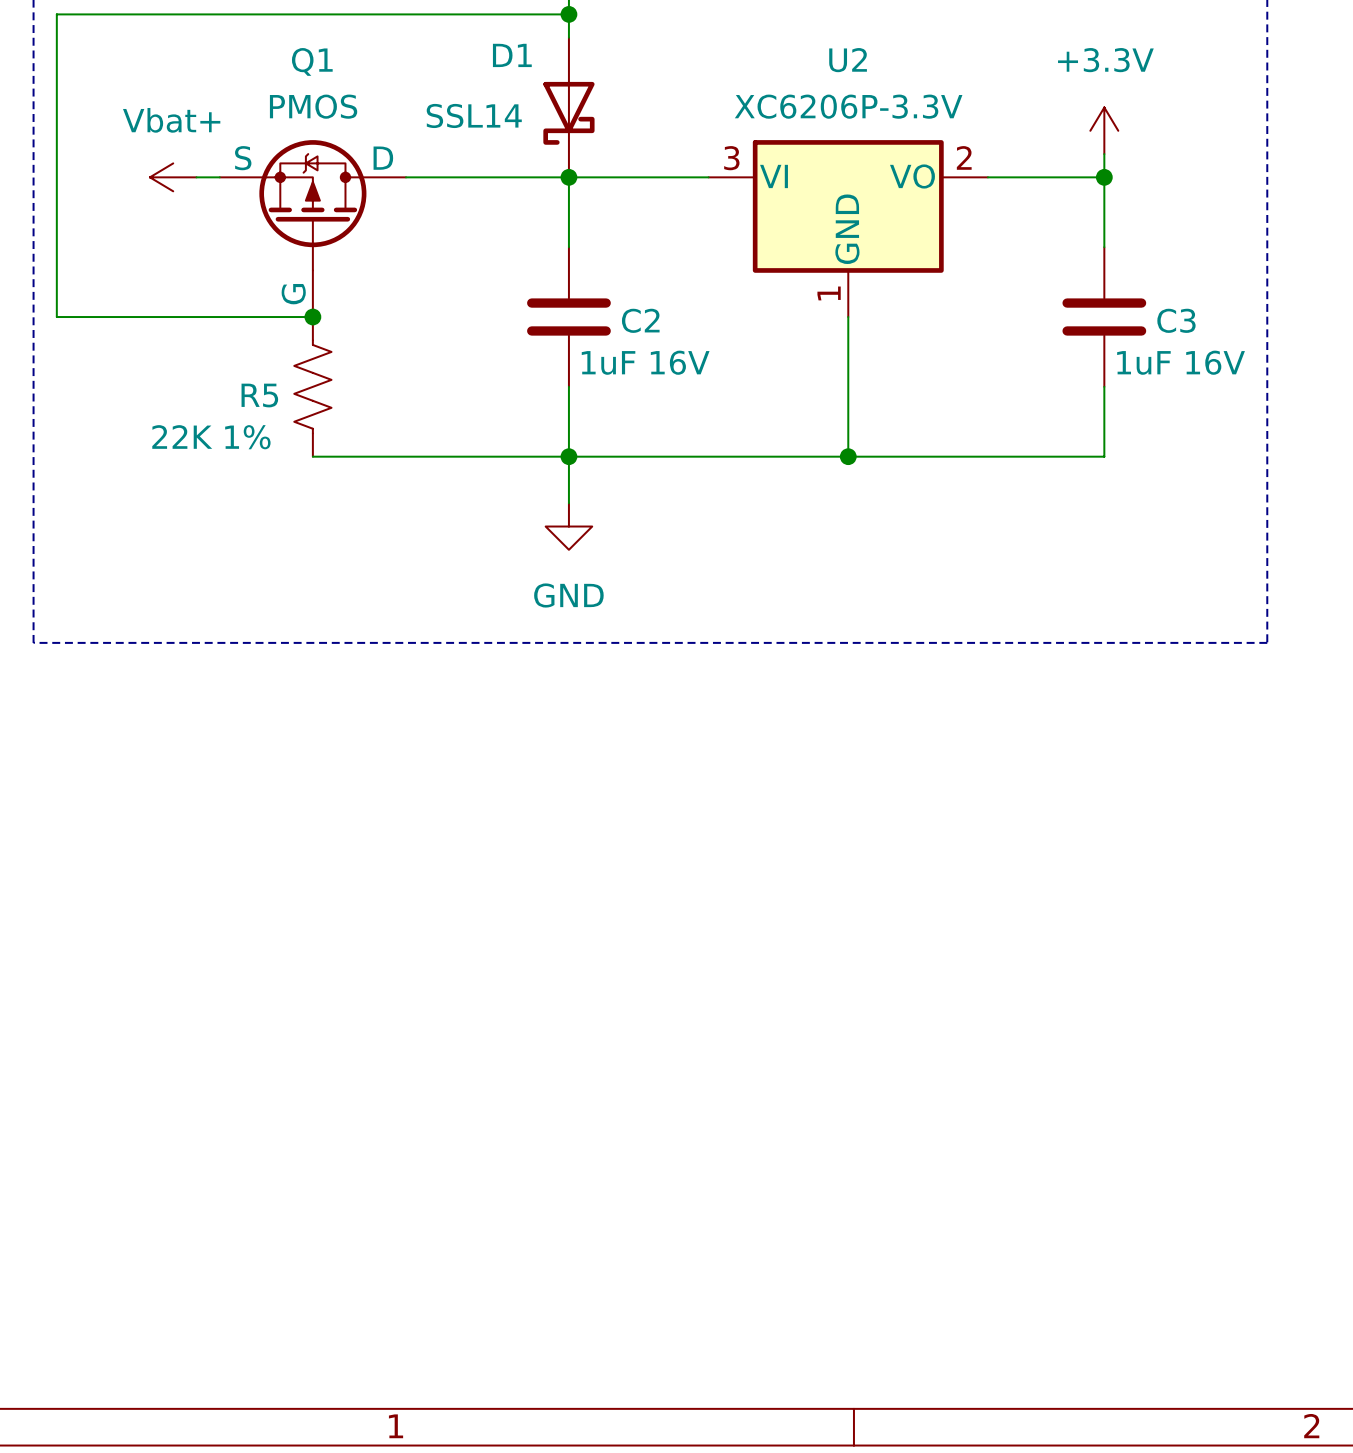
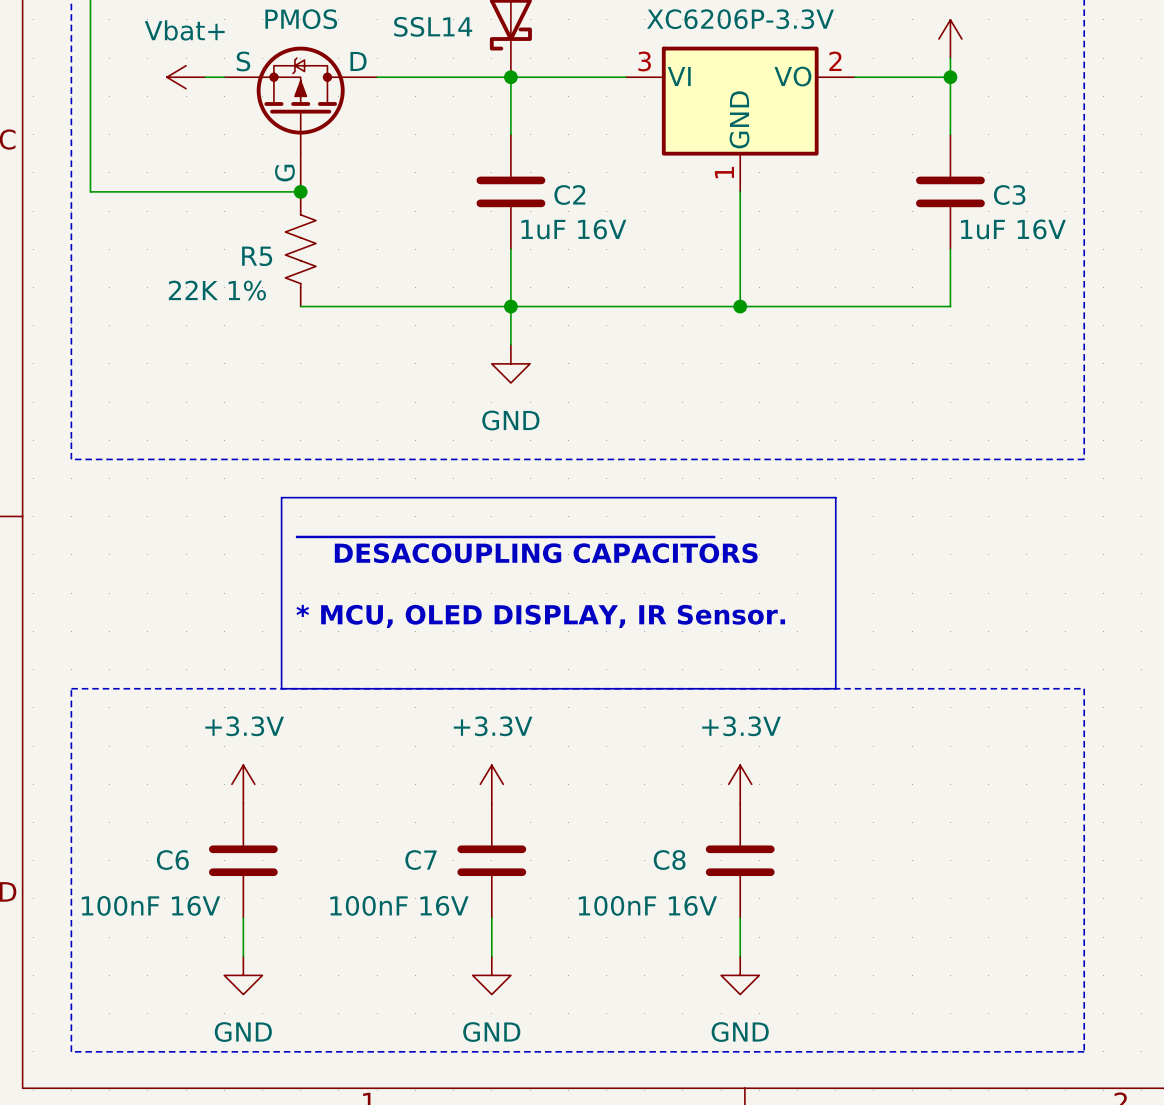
line: none -> (281, 497) (835, 497) (835, 688) (281, 688) (281, 497)
text: none -> ________________________________ (505, 536)
text: none -> DESACOUPLING CAPACITORS (546, 553)
text: none -> * MCU, OLED DISPLAY, IR Sensor. (540, 616)
line: none -> (71, 688) (1084, 688) (1084, 1051) (71, 1051) (71, 688)
power symbol: none -> +3.3V (243, 784)
power symbol: none -> +3.3V (491, 784)
power symbol: none -> +3.3V (740, 784)
C6: none -> 100nF 16V (243, 860)
C7: none -> 100nF 16V (491, 860)
C8: none -> 100nF 16V (740, 860)
wire: none -> (243, 918) (243, 956)
wire: none -> (491, 918) (491, 956)
wire: none -> (740, 918) (740, 956)
power symbol: none -> GND (243, 975)
power symbol: none -> GND (491, 975)
power symbol: none -> GND (740, 975)

